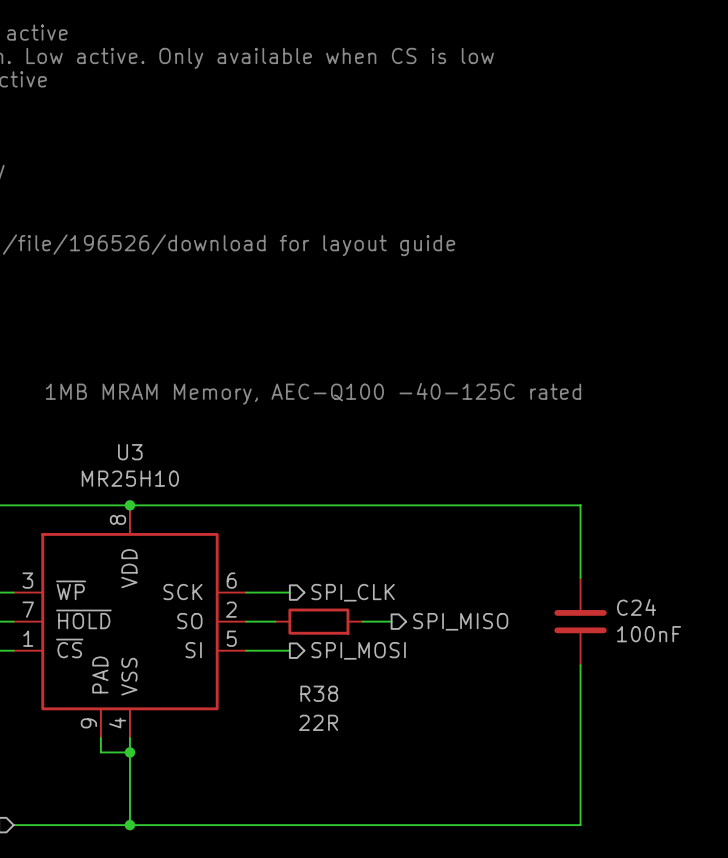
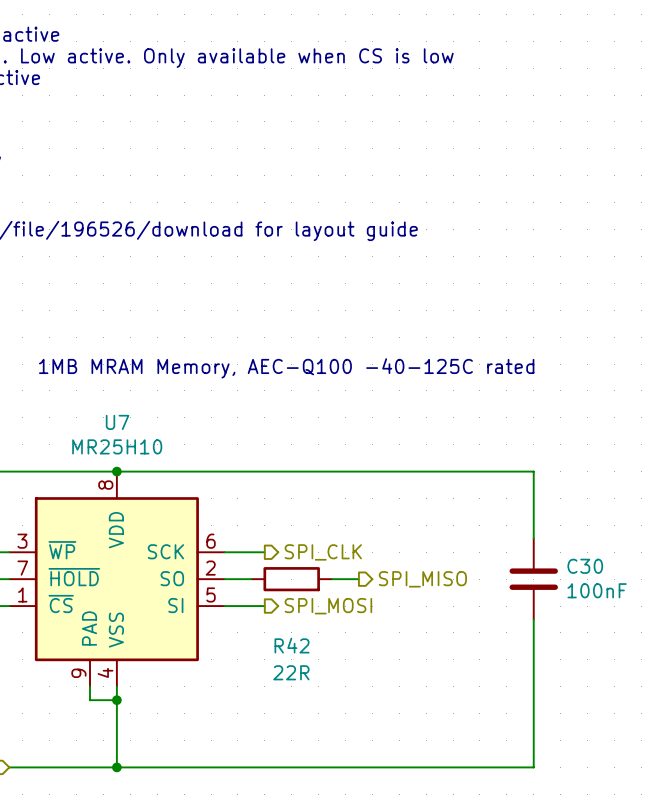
U3 name: U3 (130, 452) -> U7 (117, 422)
C24 name: C24 (636, 607) -> C30 (585, 566)
R38 name: R38 (319, 693) -> R42 (292, 645)

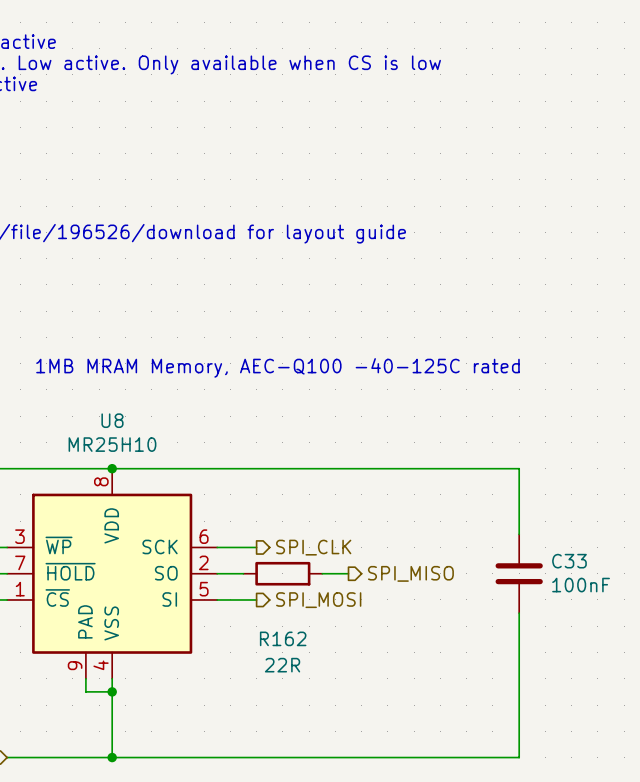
U7 name: U7 (117, 422) -> U8 (112, 420)
C30 name: C30 (585, 566) -> C33 (569, 561)
R42 name: R42 (292, 645) -> R162 (283, 638)

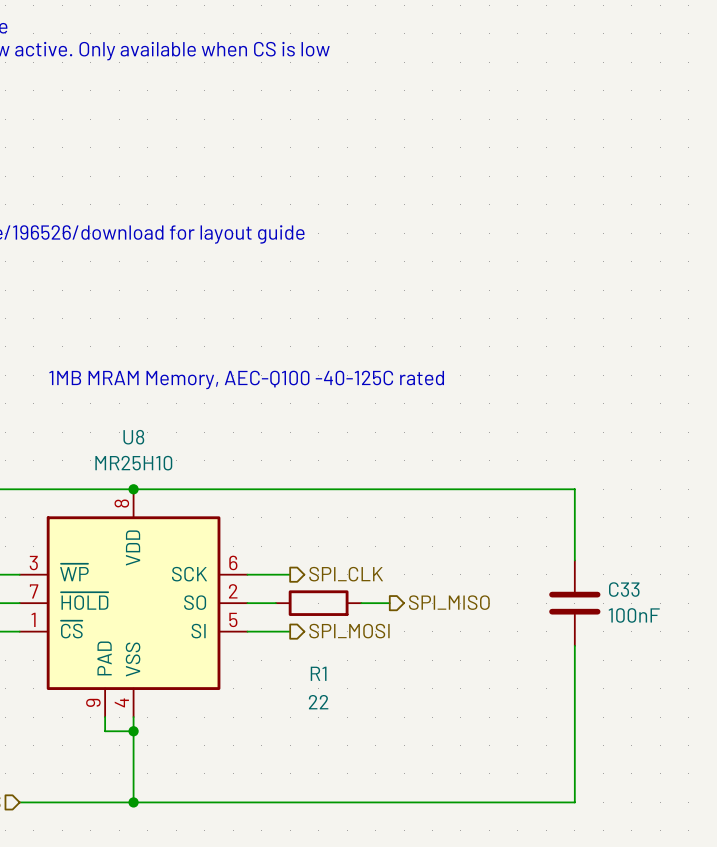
R162 name: R162 (283, 638) -> R1 (318, 673)
R162 value: 22R (282, 665) -> 22 (318, 702)

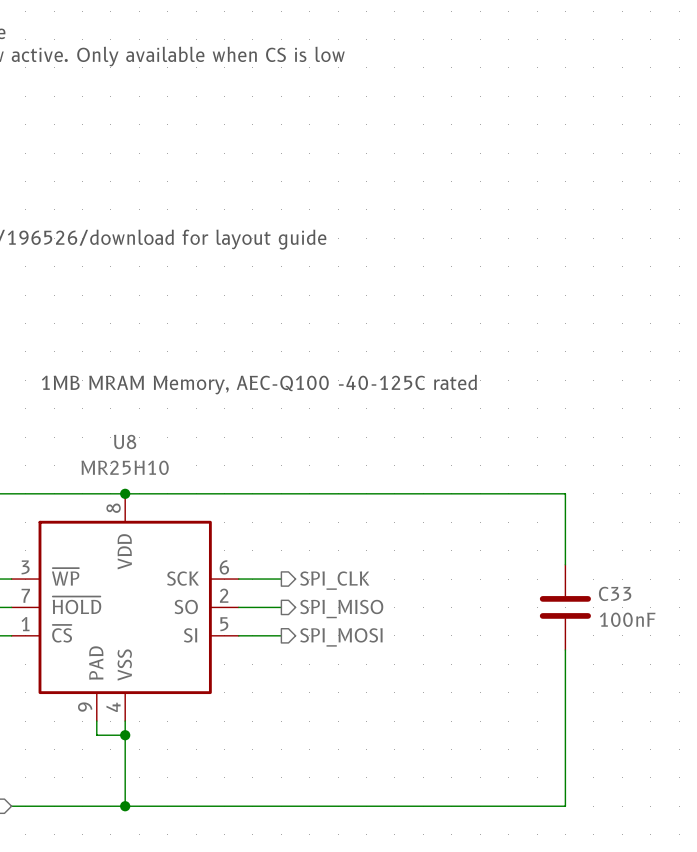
hierarchical label position: SPI_MISO (449, 602) -> SPI_MISO (341, 609)
R1: 22 (318, 603) -> none
wire: (361, 603) (389, 603) -> none

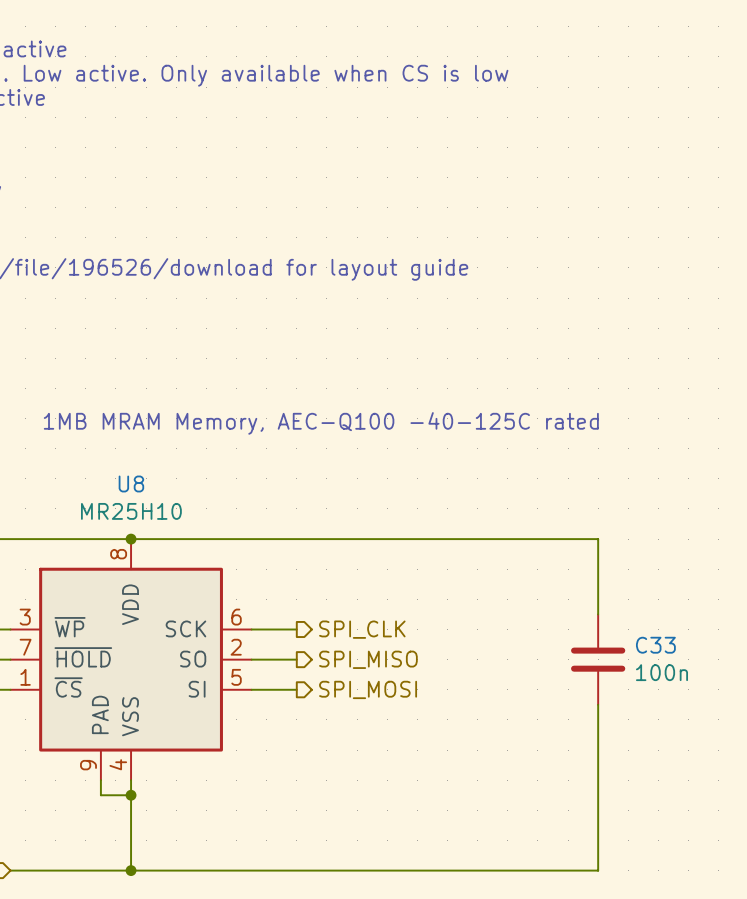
C33 value: 100nF (627, 619) -> 100n (661, 672)

